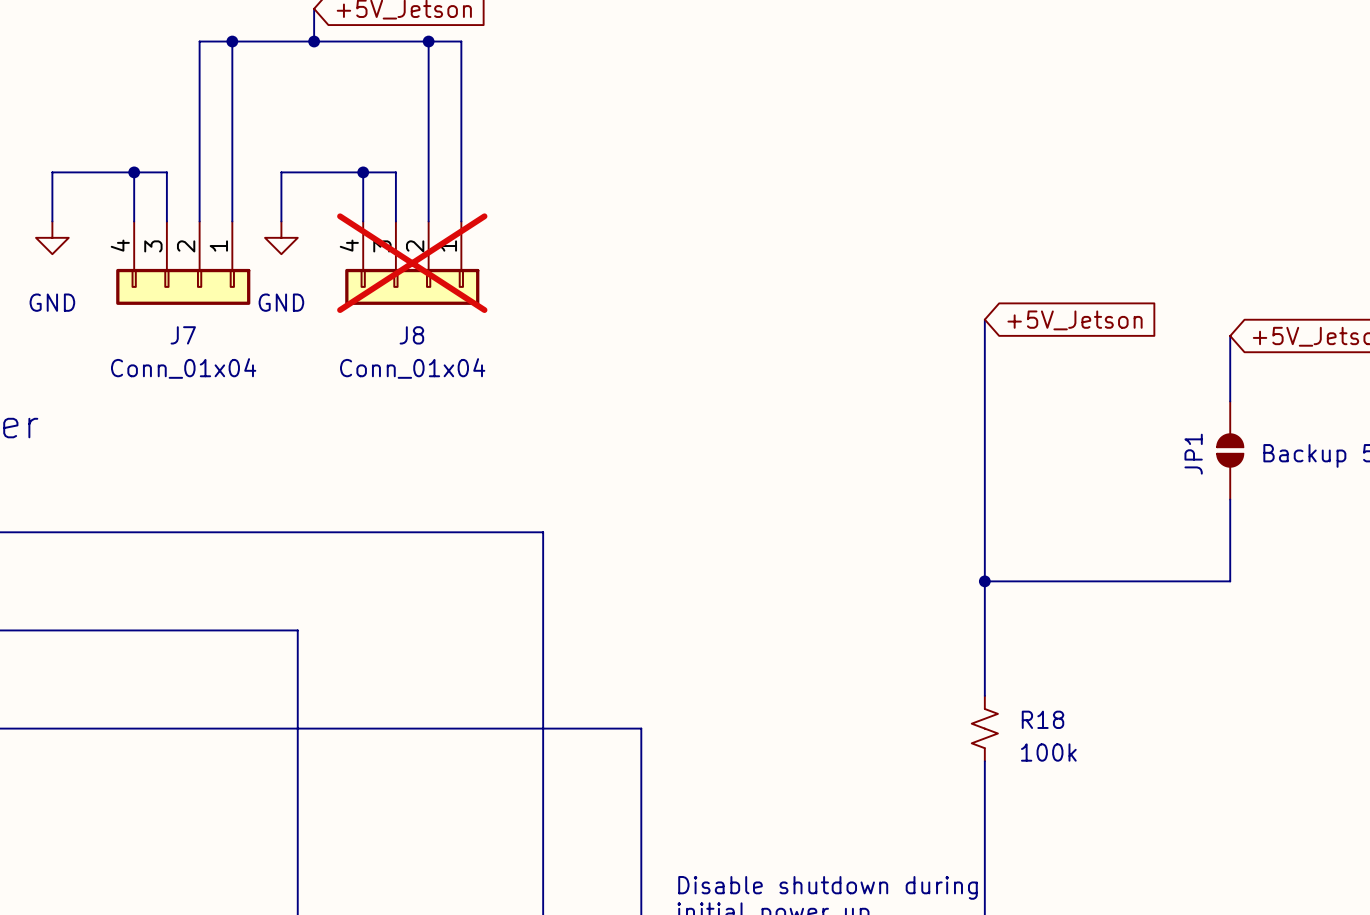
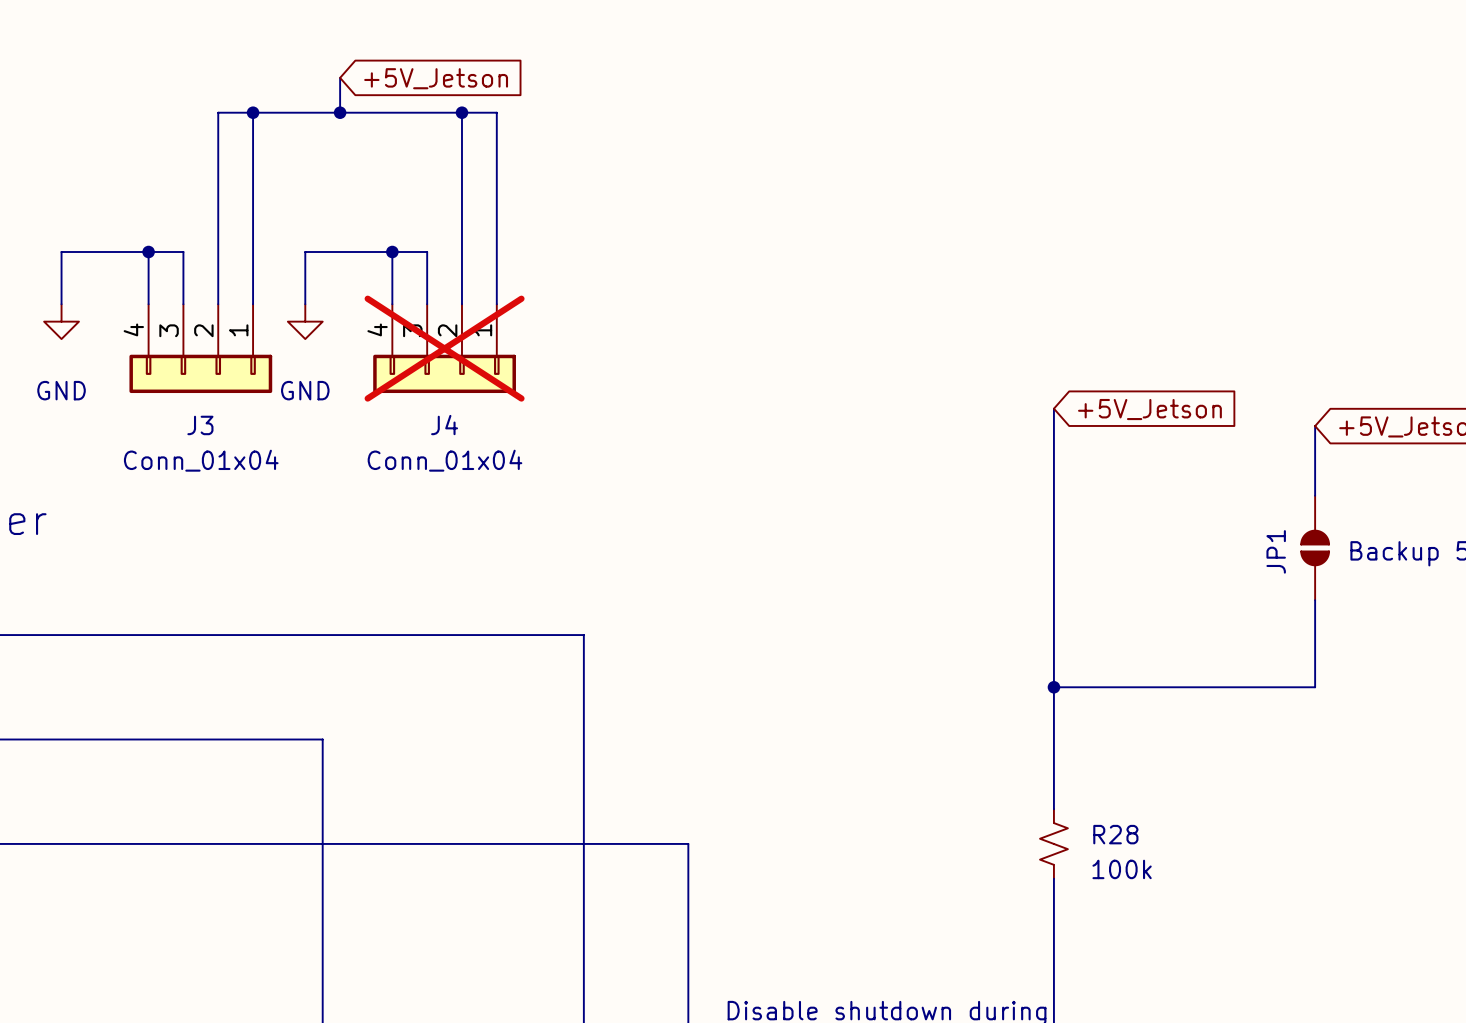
J7 name: J7 (183, 335) -> J3 (200, 425)
J8 name: J8 (411, 335) -> J4 (444, 425)
R18 name: R18 (1042, 719) -> R28 (1115, 834)

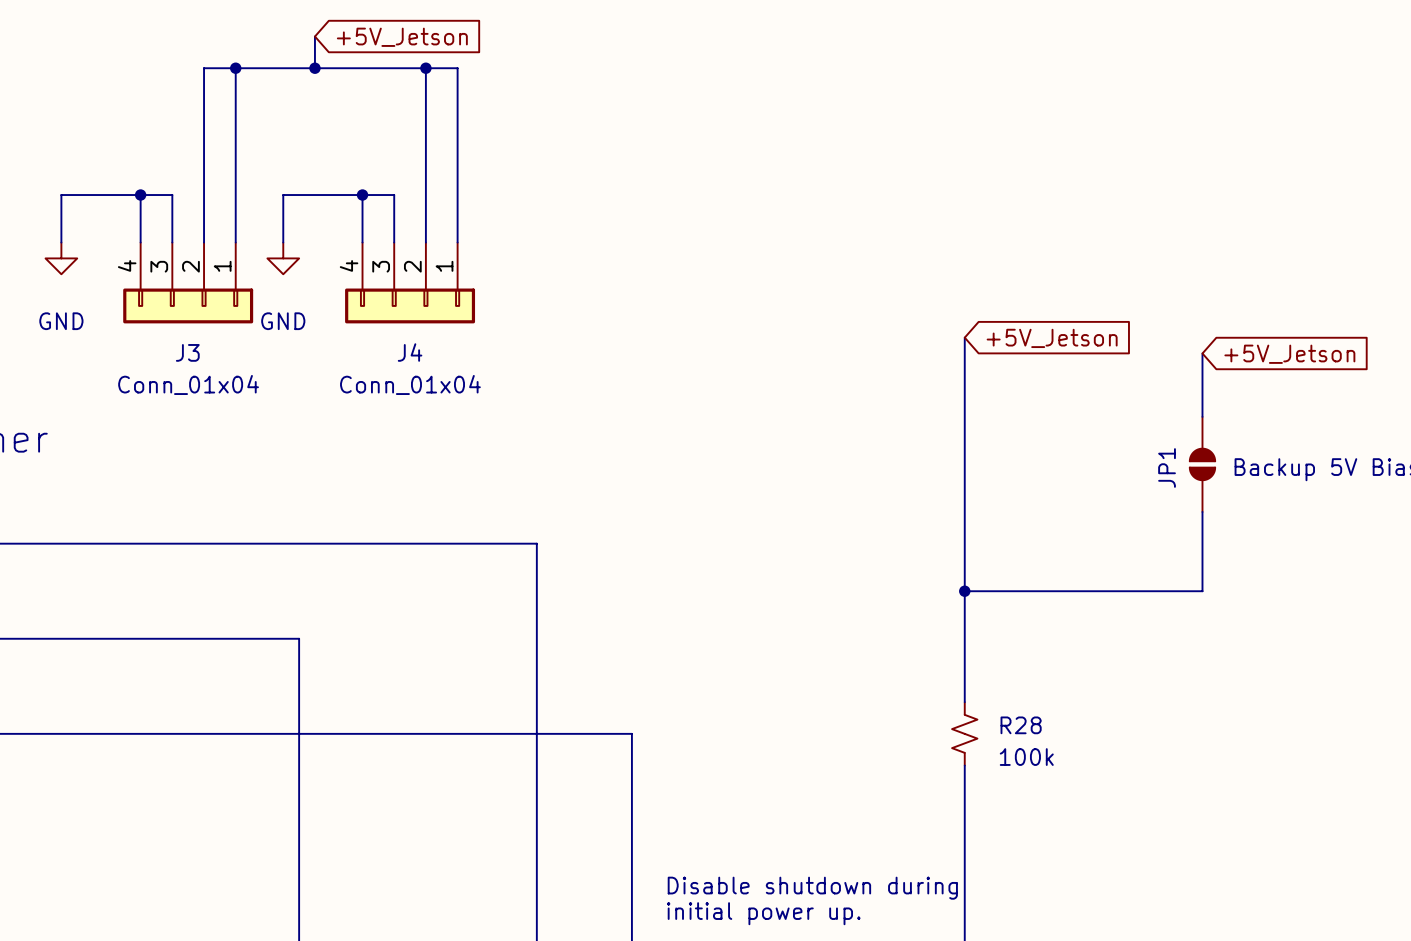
J4 do-not-place cross: (444, 348) -> none

